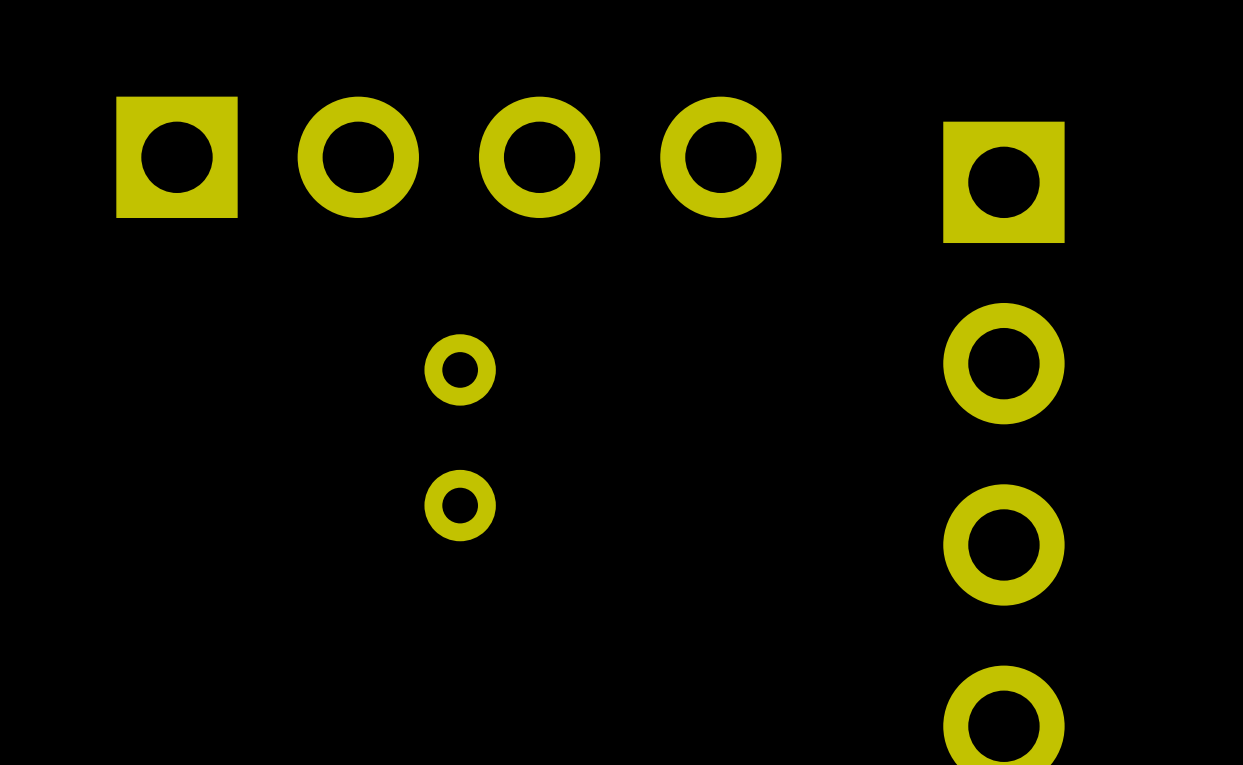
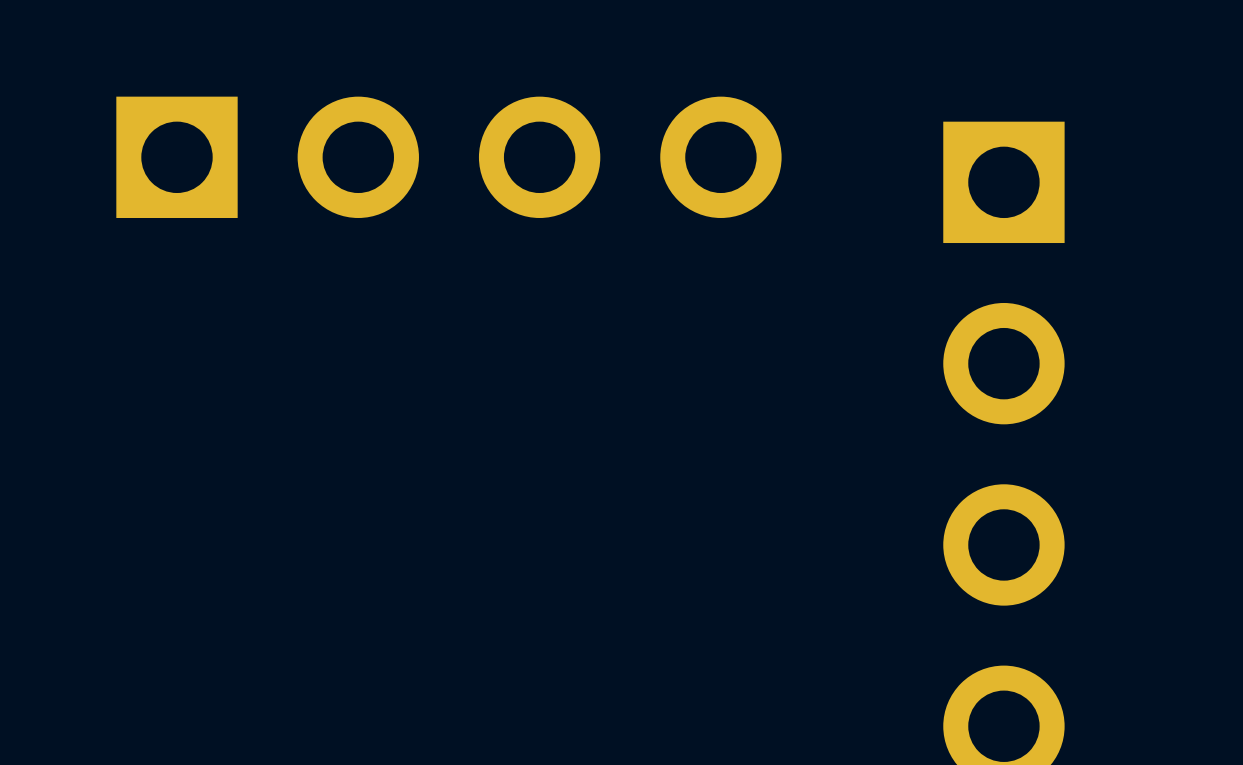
part: (460, 437) -> none

